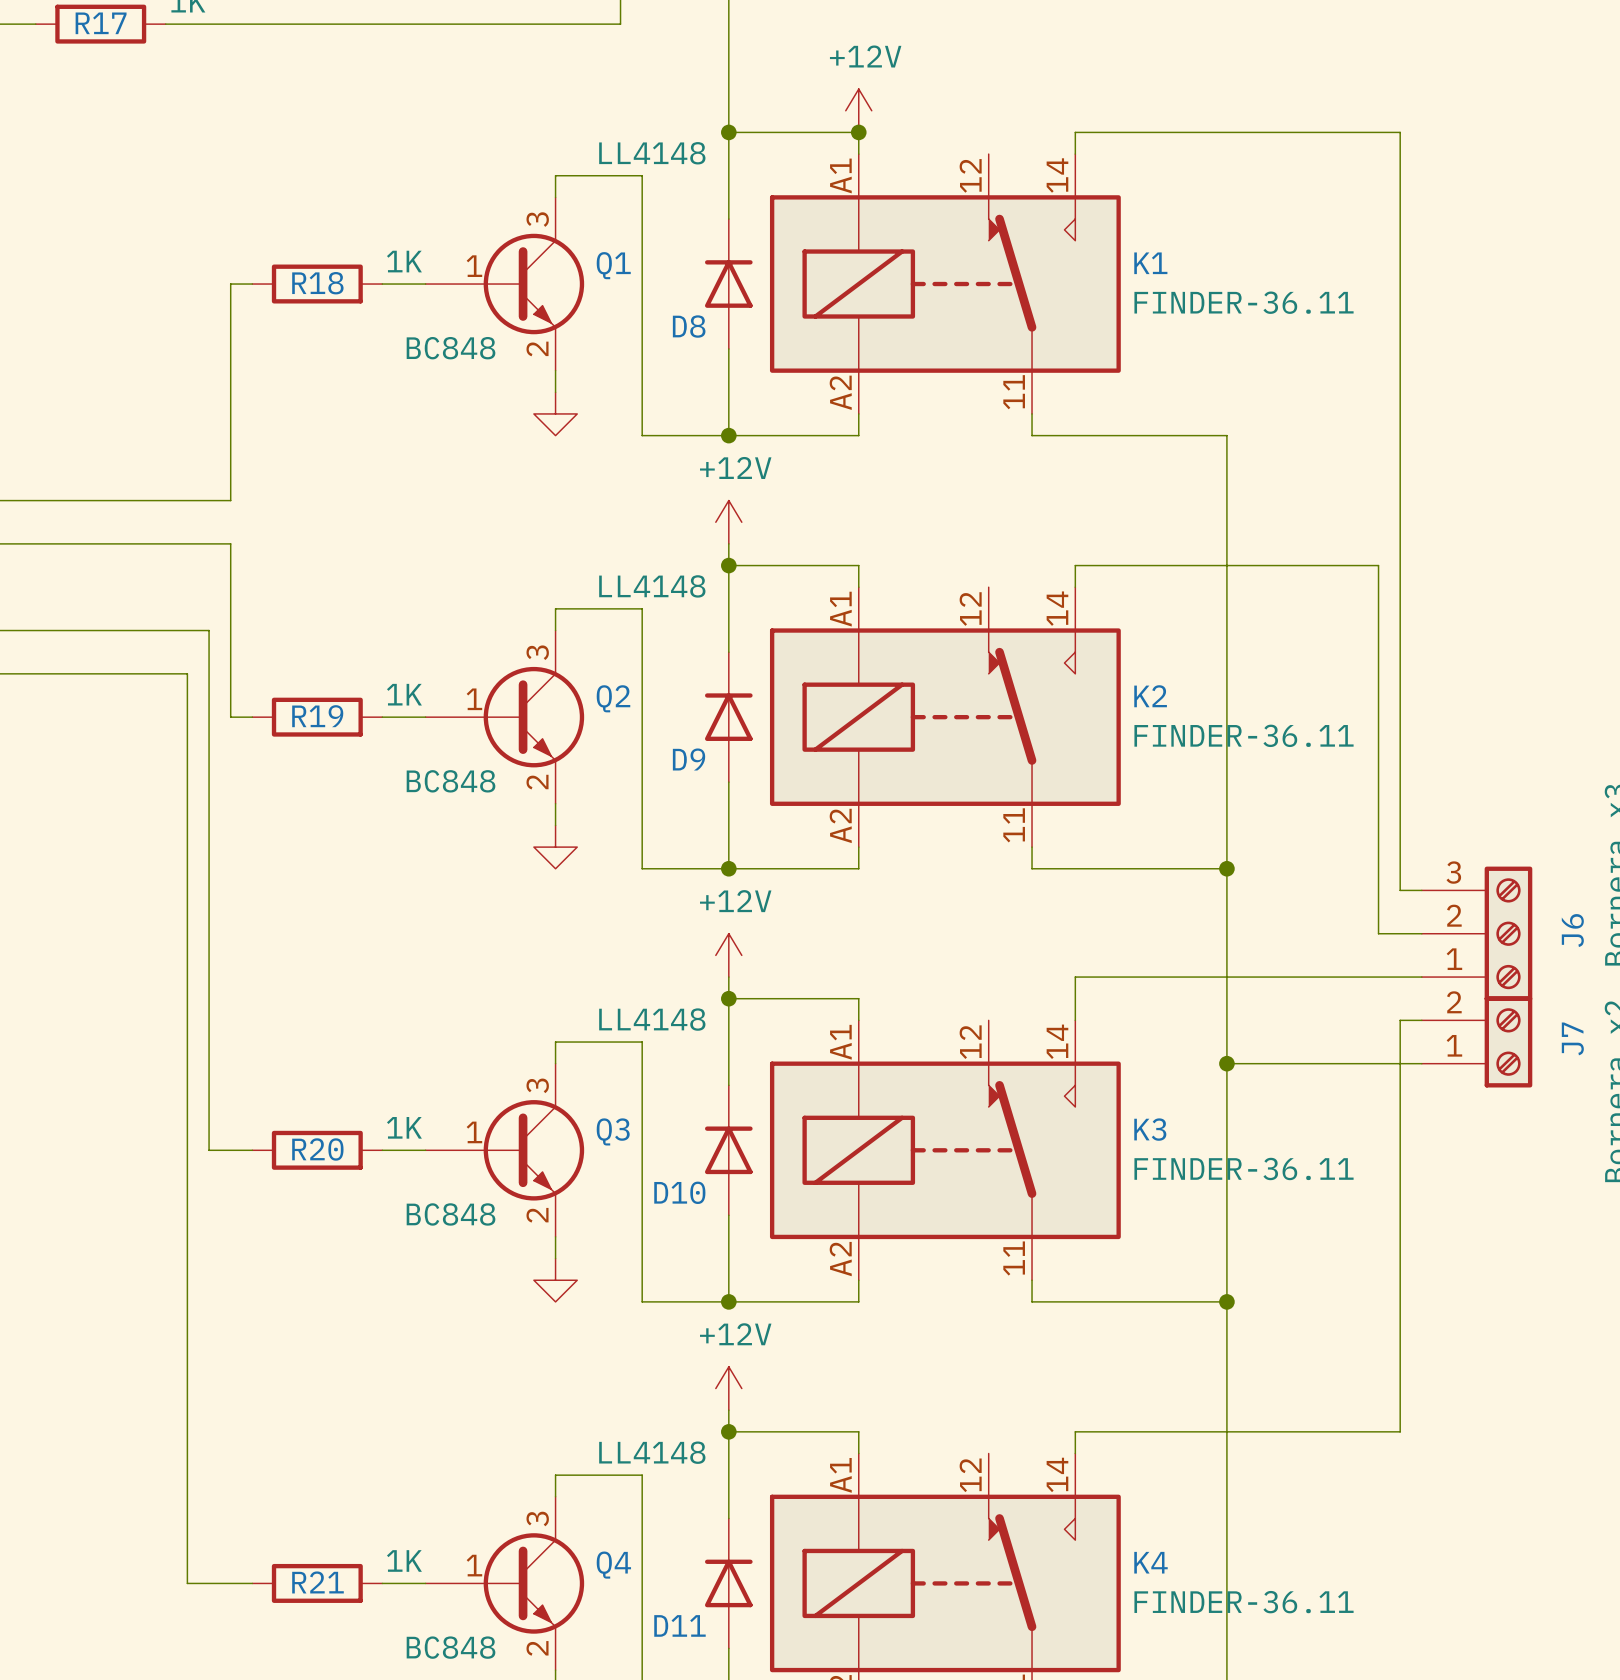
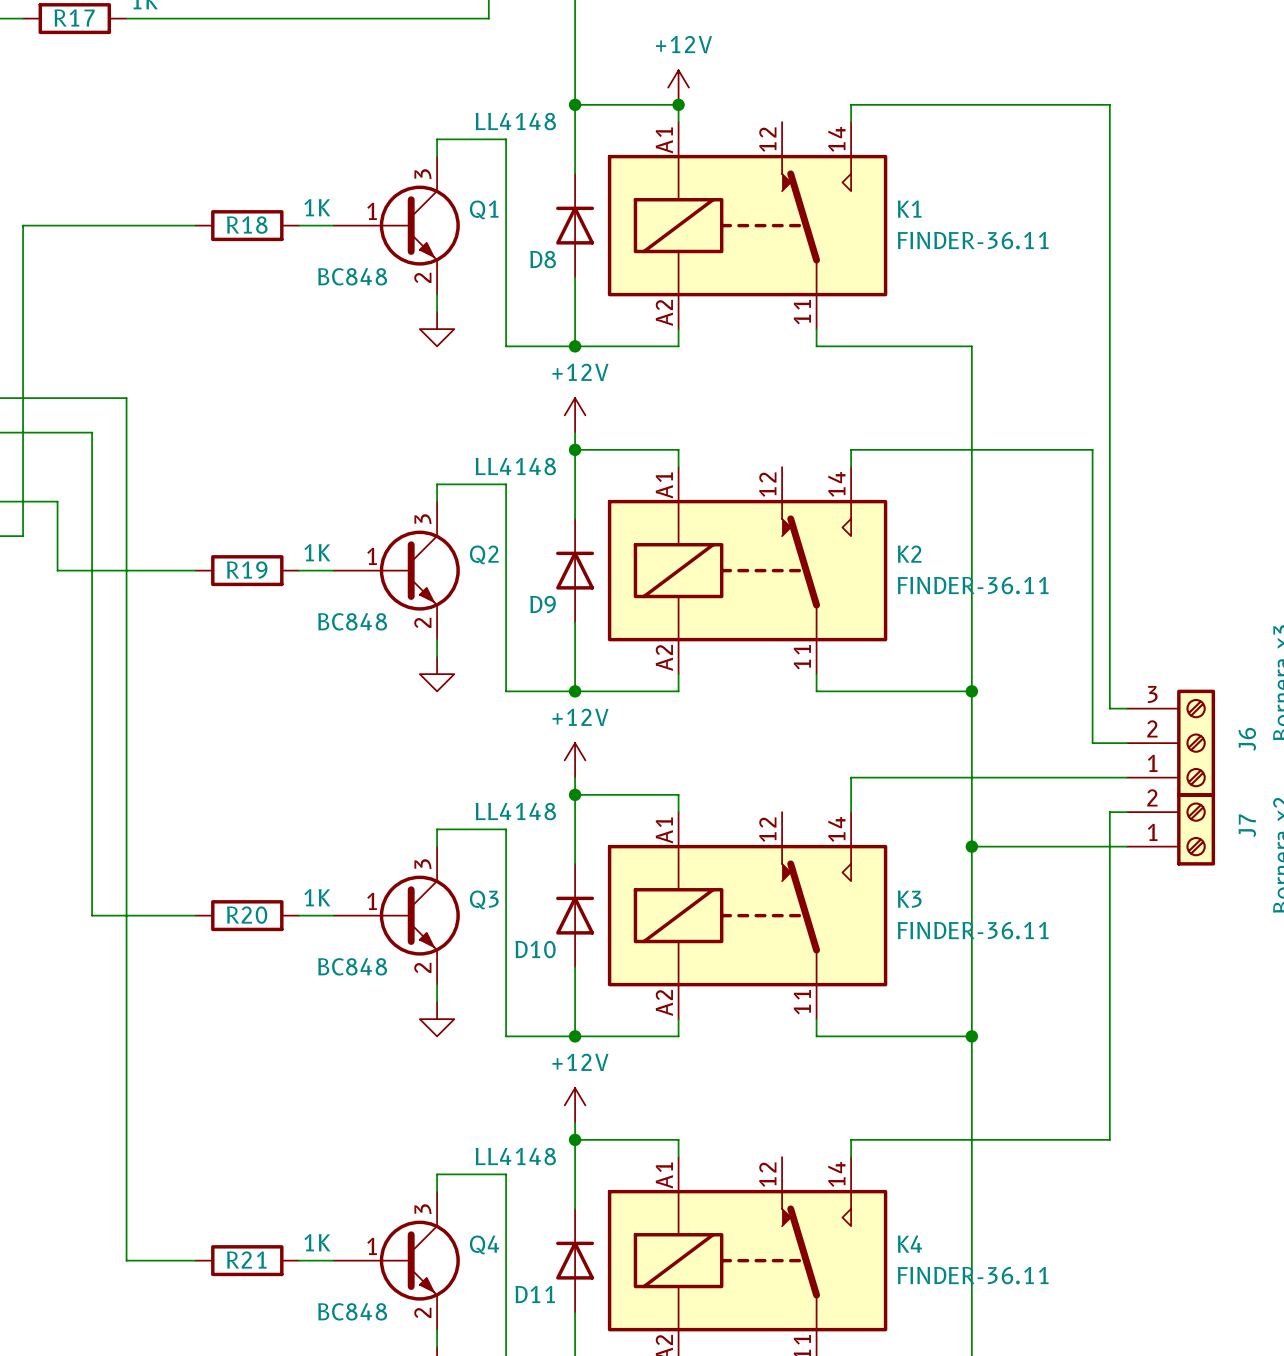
wire: (230, 284) (230, 500) (165, 500) -> (178, 225) (23, 225) (23, 536)
wire: (122, 543) (230, 543) (230, 717) -> (57, 501) (57, 570) (178, 570)
wire: (79, 630) (209, 630) (209, 1150) -> (92, 432) (92, 915) (161, 915)
wire: (35, 673) (187, 673) (187, 1583) -> (126, 398) (126, 1260) (143, 1260)

